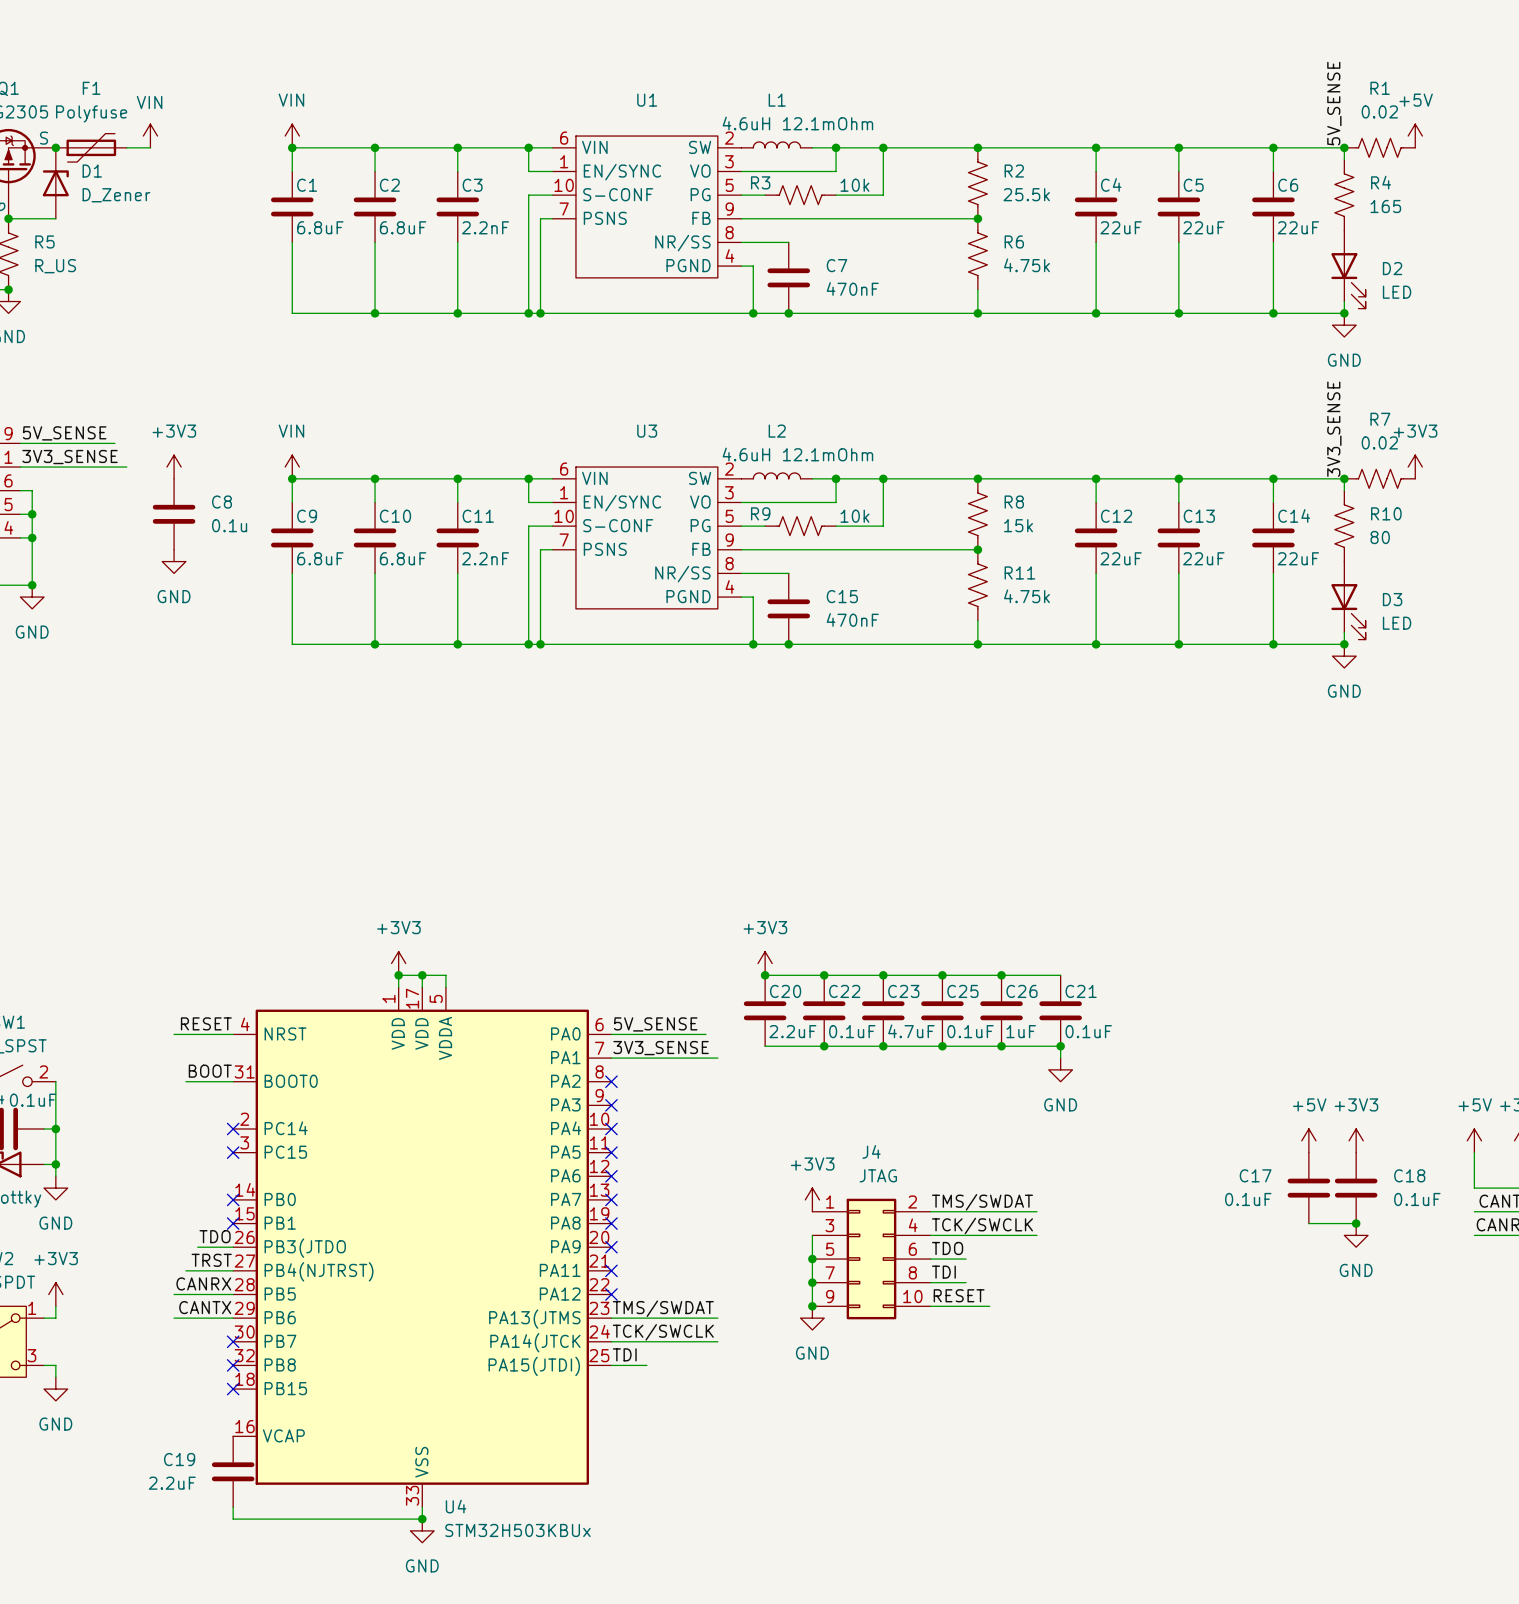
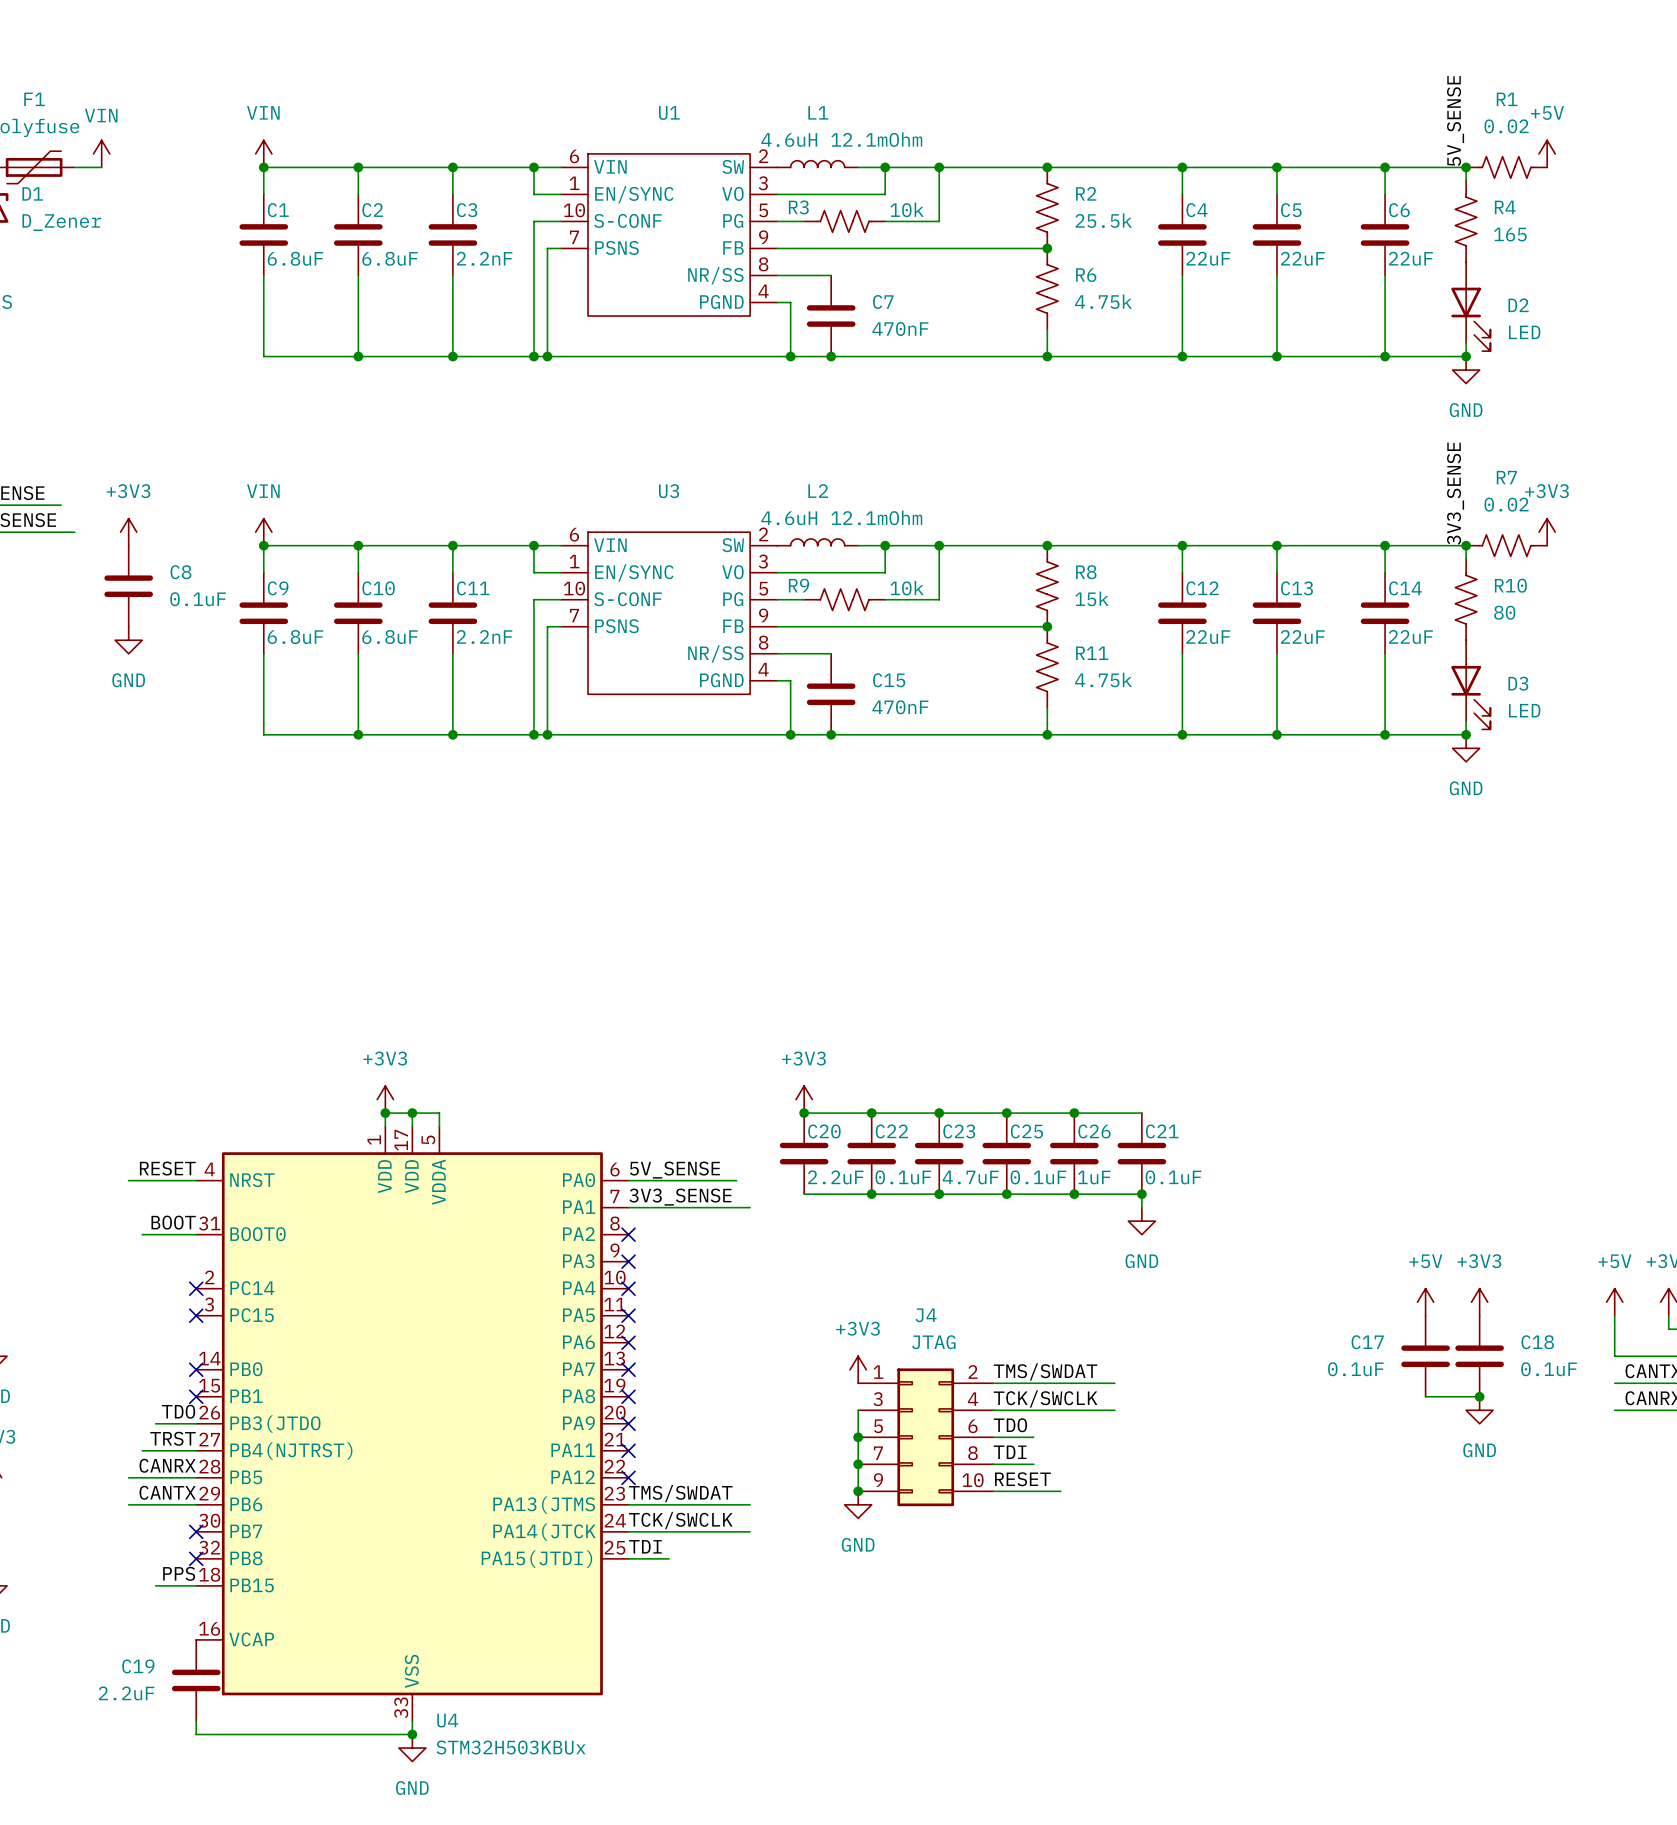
C8 value: 0.1u (229, 525) -> 0.1uF (198, 599)
label: none -> PPS (179, 1573)
wire: none -> (155, 1585) (196, 1585)
no-connect mark: (233, 1389) -> none

